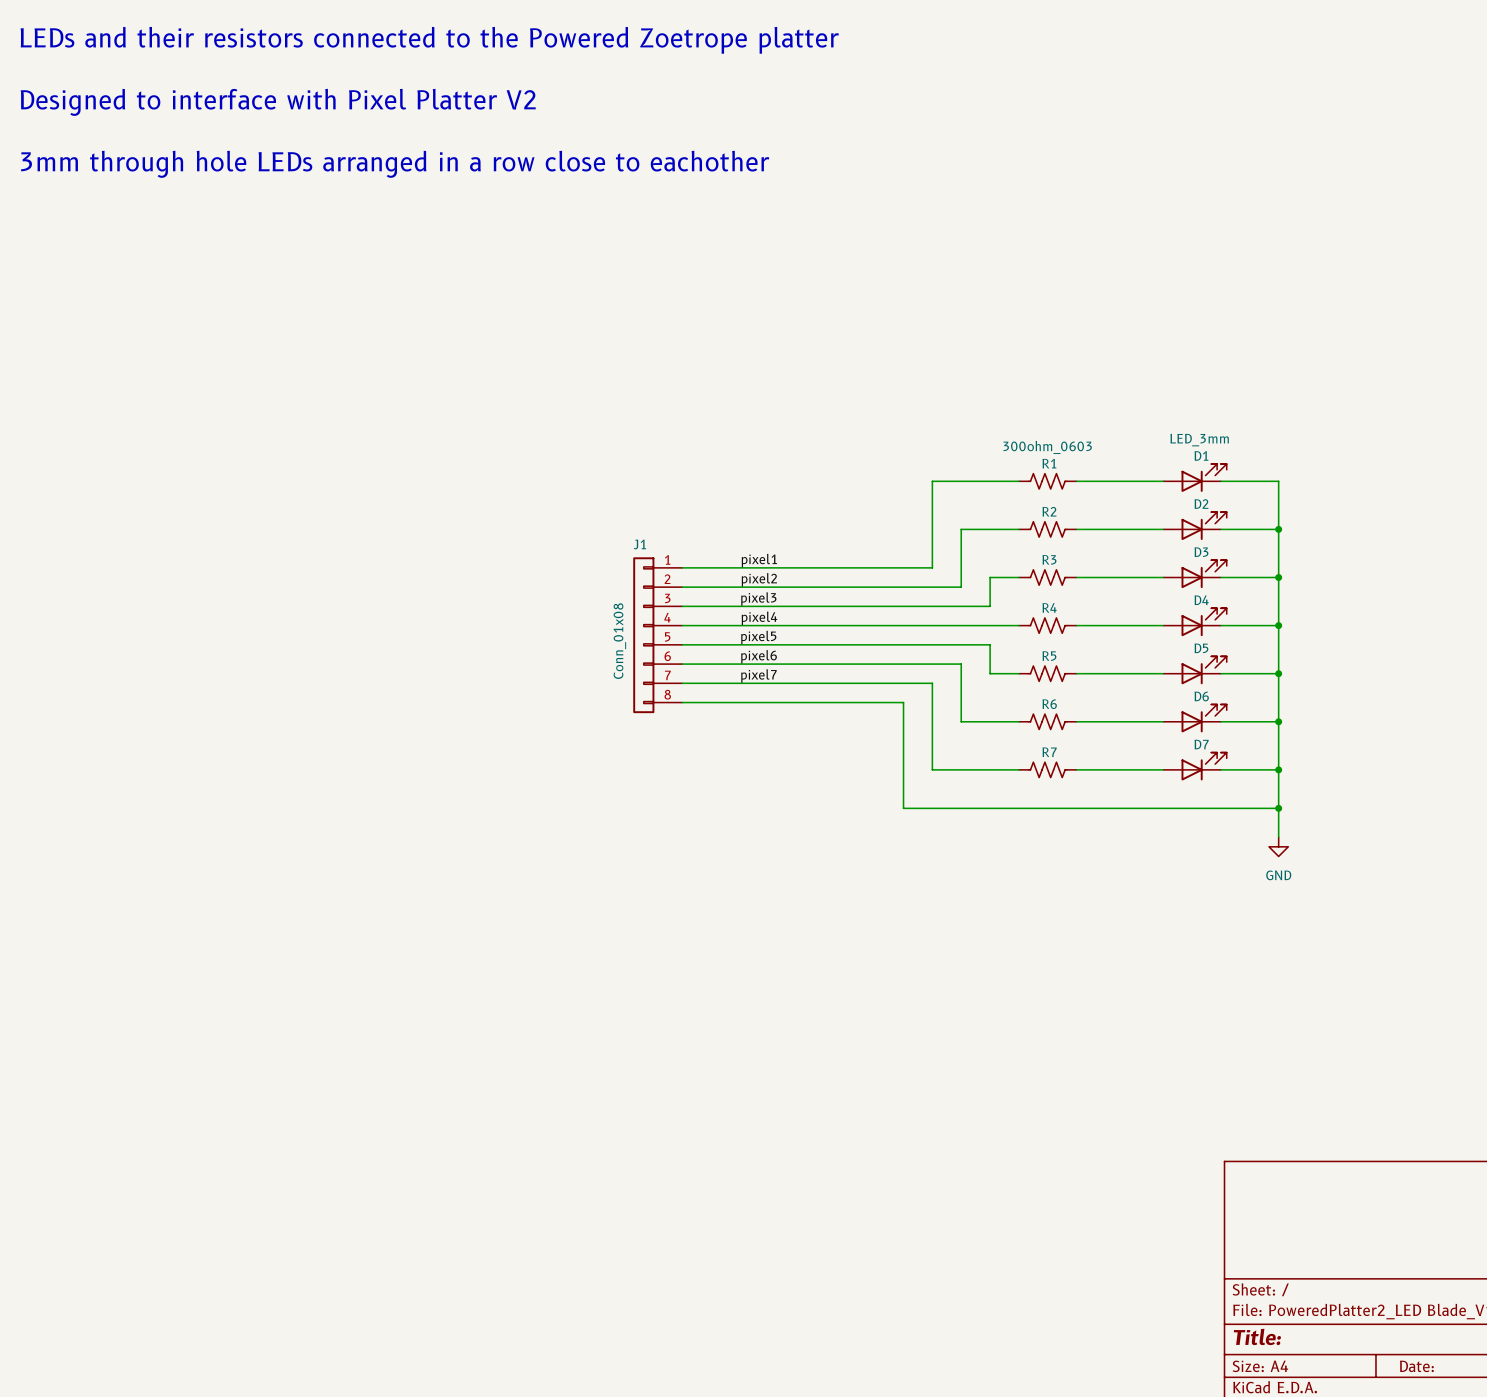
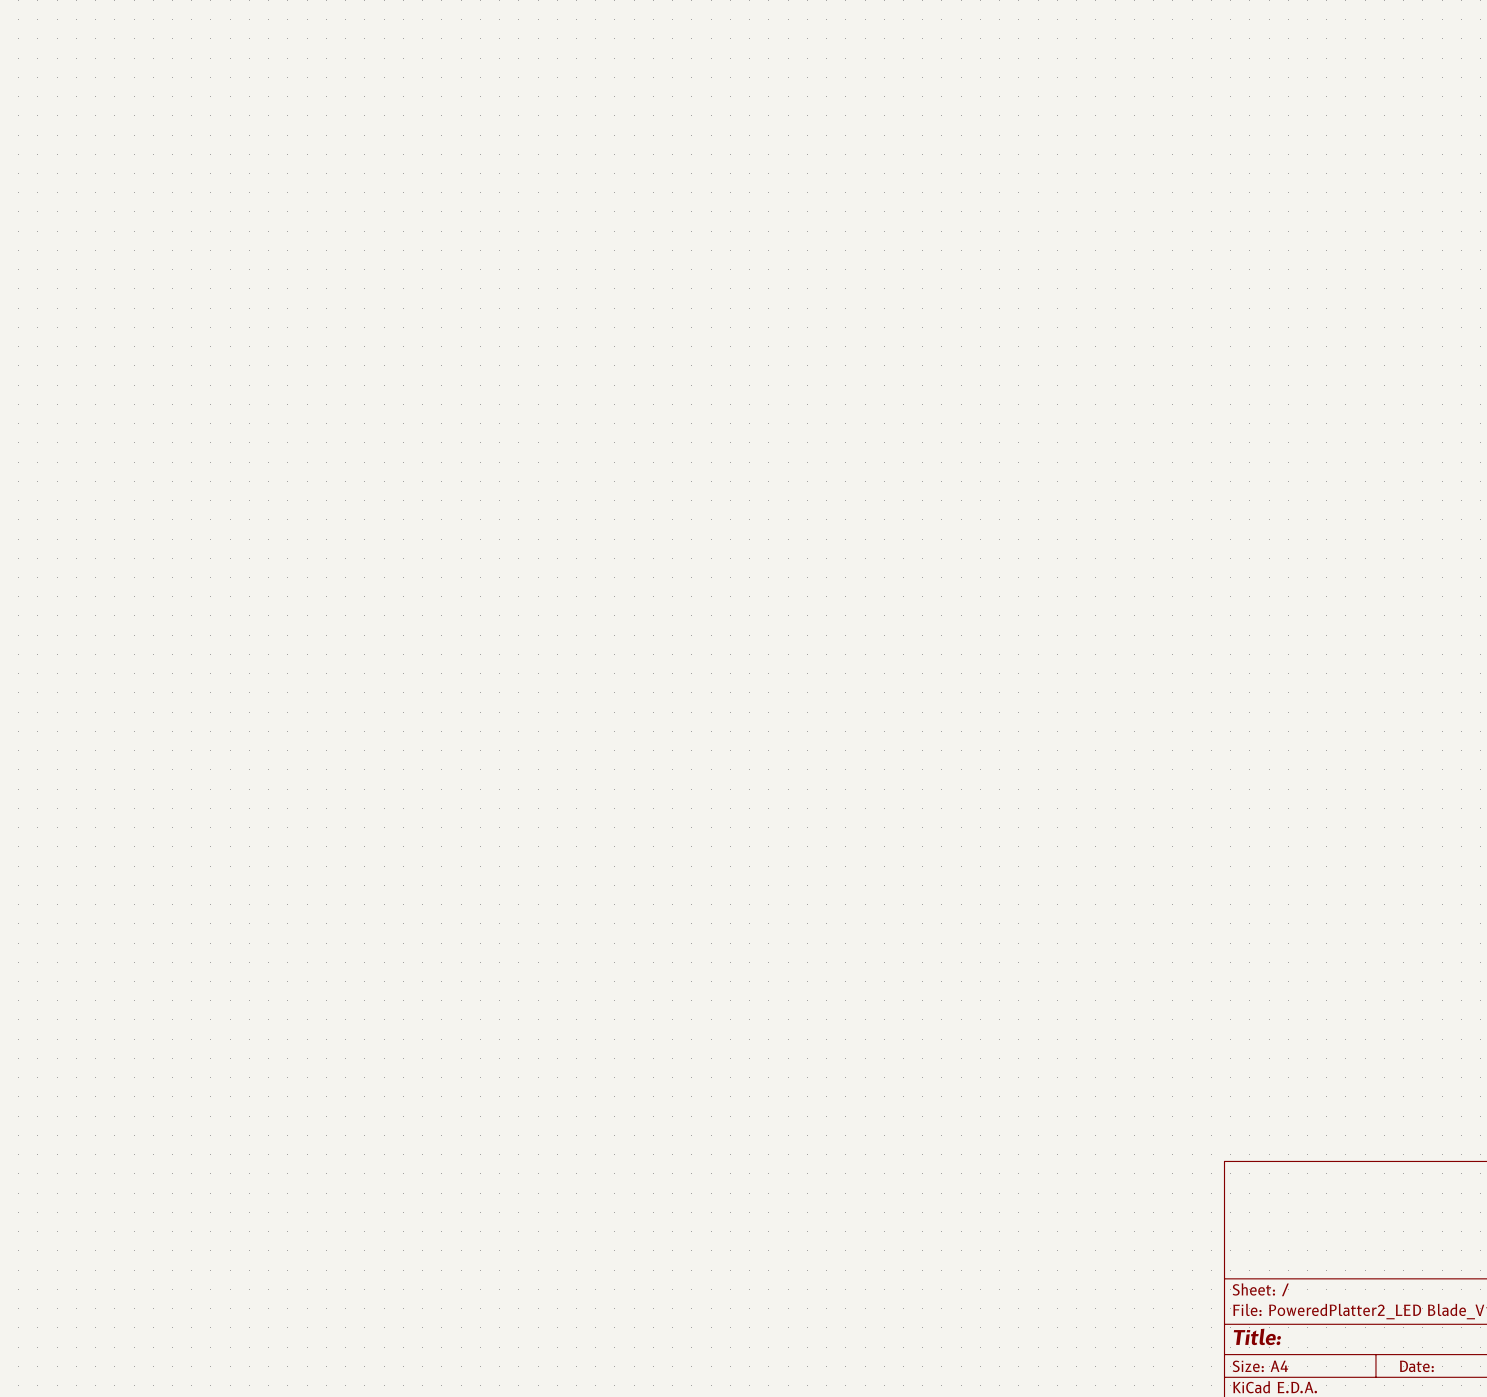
text: LEDs and their resistors connected to the Powered Zoetrope platter (429, 40) -> none
text: Designed to interface with Pixel Platter V2 (278, 102) -> none
text: 3mm through hole LEDs arranged in a row close to eachother (395, 164) -> none
D1: LED_3mm (1194, 477) -> none
wire: (1018, 481) (932, 481) (932, 567) (682, 567) -> none
R1: 300ohm_0603 (1047, 481) -> none
wire: (1076, 481) (1163, 481) -> none
wire: (1220, 481) (1278, 481) (1278, 837) -> none
D2: (1194, 526) -> none
wire: (1018, 529) (961, 529) (961, 587) (682, 587) -> none
R2: (1047, 529) -> none
wire: (1076, 529) (1163, 529) -> none
wire: (1220, 529) (1278, 529) -> none
junction: (1278, 529) -> none
label: pixel1 (759, 560) -> none
D3: (1194, 574) -> none
wire: (1018, 577) (990, 577) (990, 606) (682, 606) -> none
R3: (1047, 577) -> none
wire: (1076, 577) (1163, 577) -> none
wire: (1220, 577) (1278, 577) -> none
junction: (1278, 577) -> none
label: pixel2 (759, 579) -> none
label: pixel3 (758, 599) -> none
label: pixel4 (759, 618) -> none
D4: (1194, 622) -> none
wire: (682, 625) (1018, 625) -> none
R4: (1047, 625) -> none
wire: (1076, 625) (1163, 625) -> none
wire: (1220, 625) (1278, 625) -> none
junction: (1278, 625) -> none
J1: Conn_01x08 (657, 635) -> none
label: pixel5 (758, 637) -> none
wire: (682, 644) (990, 644) (990, 673) (1018, 673) -> none
label: pixel6 (759, 656) -> none
wire: (682, 664) (961, 664) (961, 721) (1018, 721) -> none
D5: (1194, 670) -> none
R5: (1047, 673) -> none
wire: (1076, 673) (1163, 673) -> none
wire: (1220, 673) (1278, 673) -> none
junction: (1278, 673) -> none
label: pixel7 (758, 675) -> none
wire: (682, 683) (932, 683) (932, 769) (1018, 769) -> none
wire: (682, 702) (903, 702) (903, 808) (1278, 808) -> none
D6: (1194, 718) -> none
R6: (1047, 721) -> none
wire: (1076, 721) (1163, 721) -> none
wire: (1220, 721) (1278, 721) -> none
junction: (1278, 721) -> none
D7: (1194, 766) -> none
R7: (1047, 769) -> none
wire: (1076, 769) (1163, 769) -> none
wire: (1220, 769) (1278, 769) -> none
junction: (1278, 769) -> none
junction: (1278, 808) -> none
power symbol: GND (1278, 846) -> none

